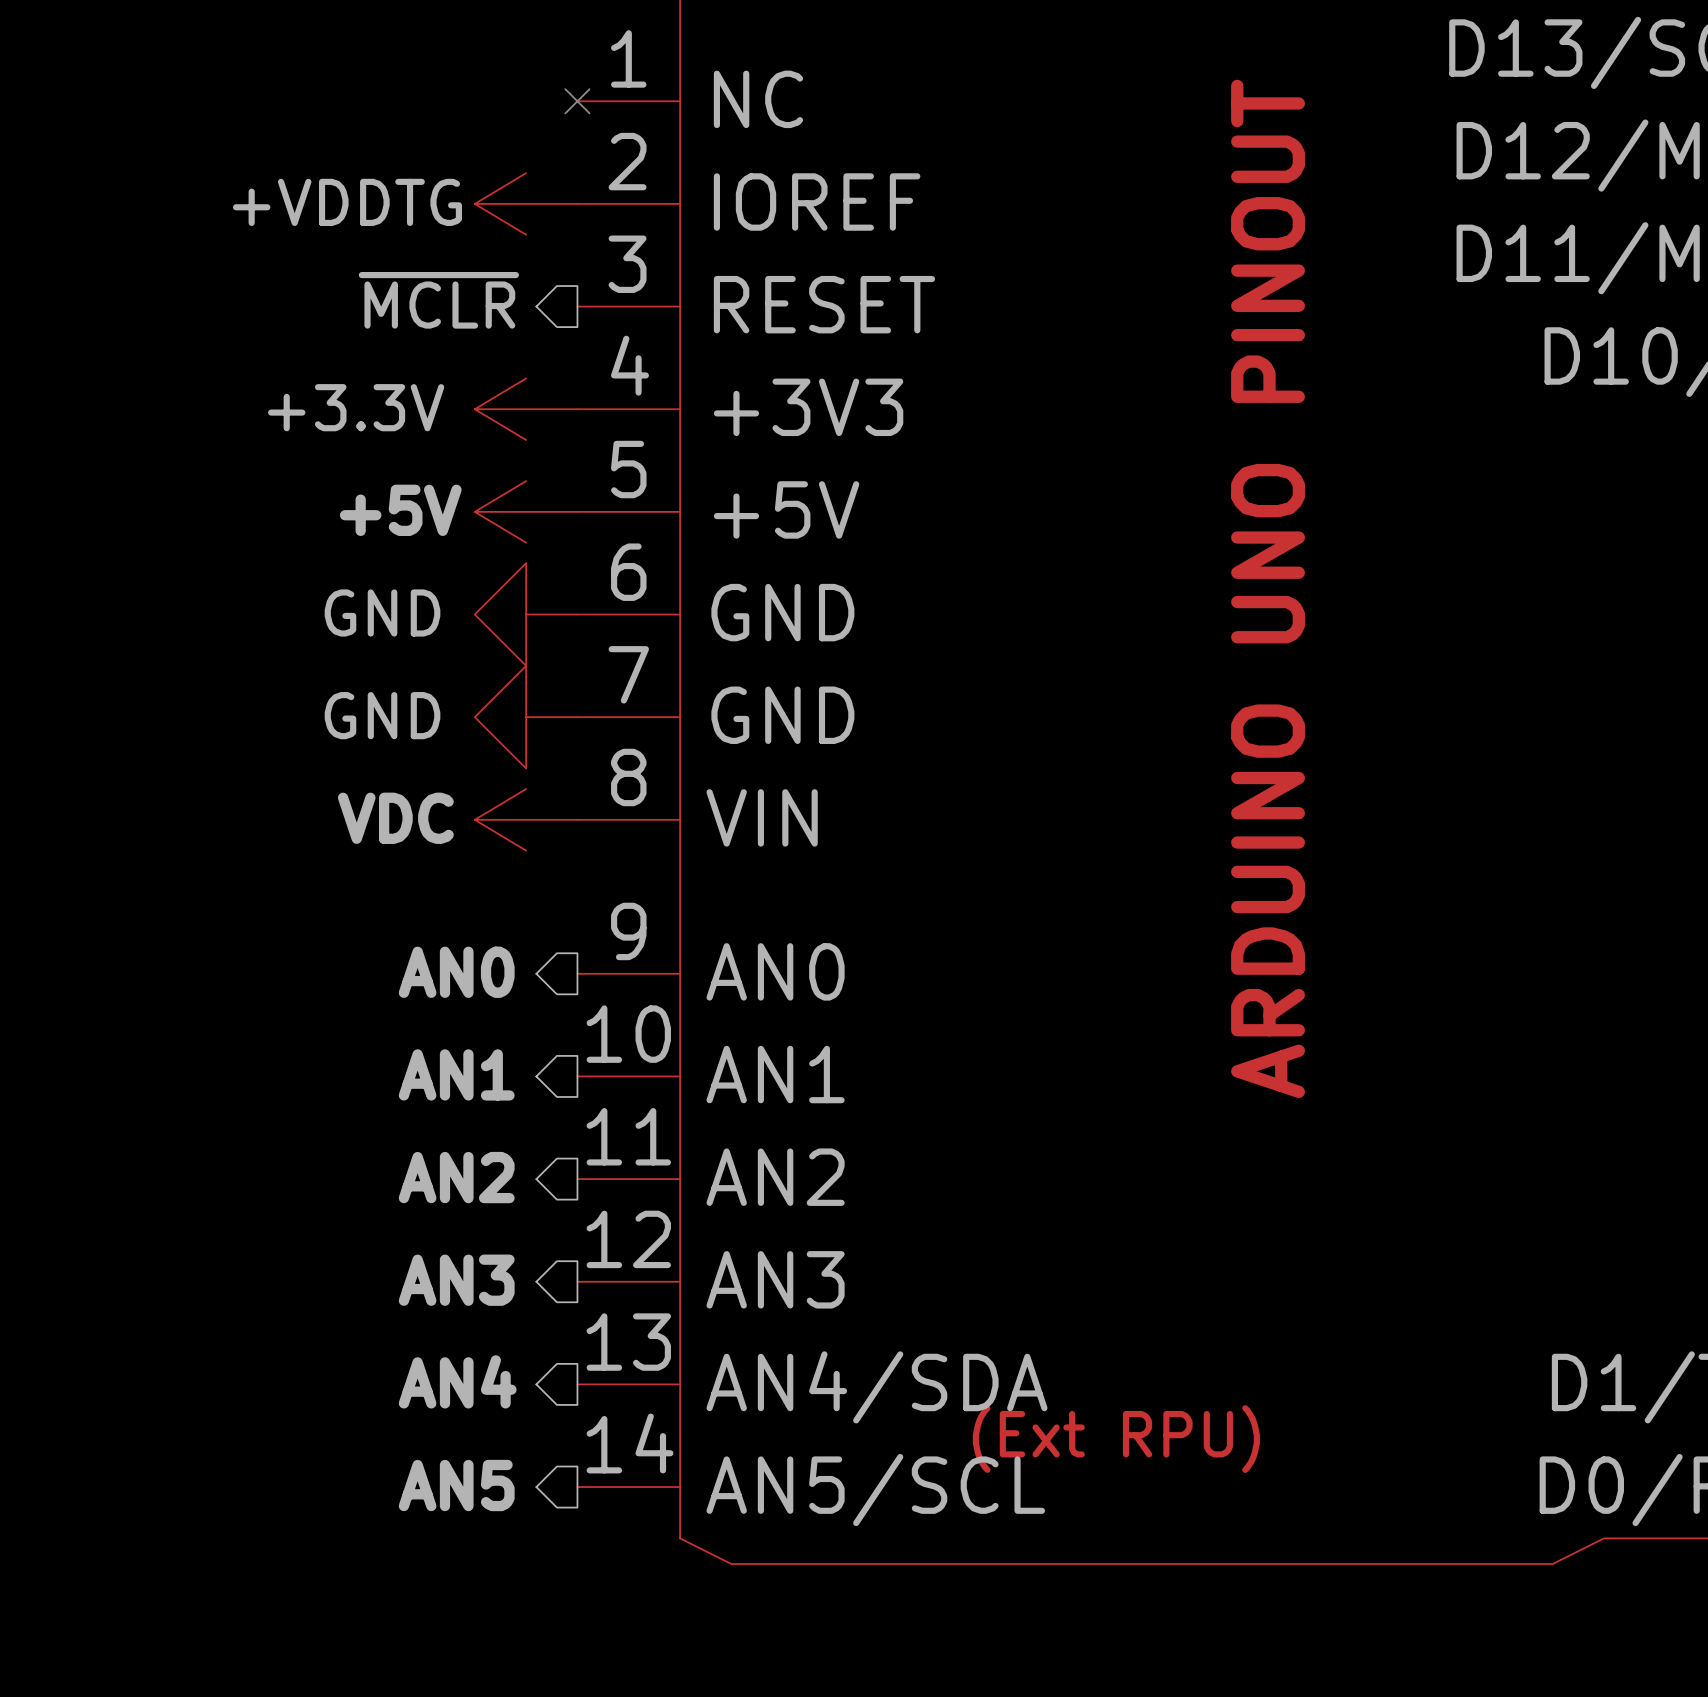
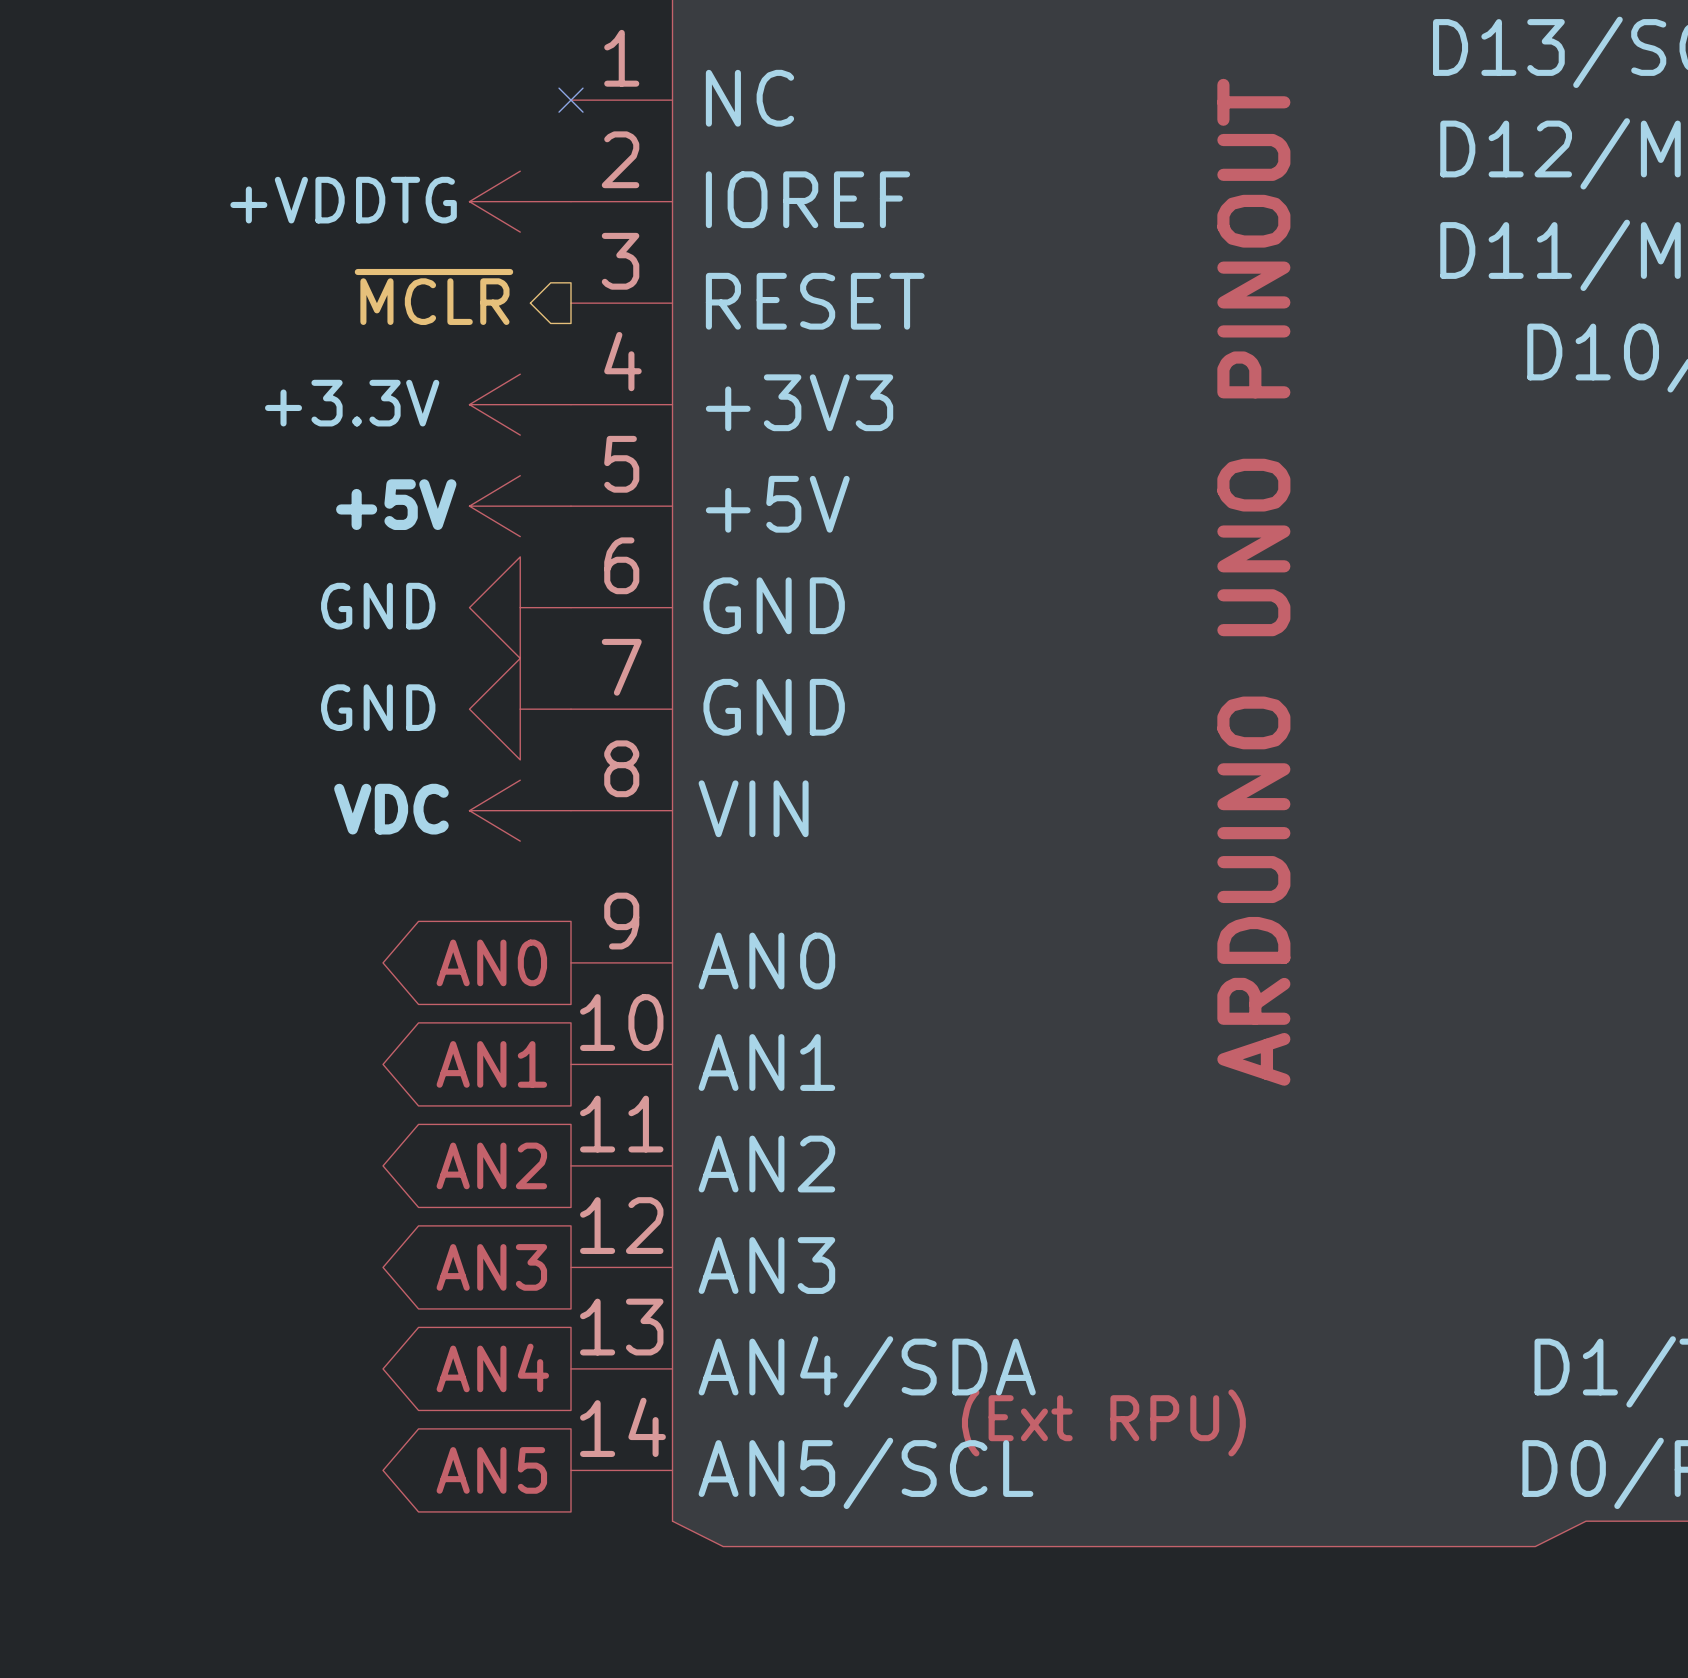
hierarchical label: AN0 (456, 972) -> none
global label: none -> AN0 (491, 962)
hierarchical label: AN1 (456, 1074) -> none
global label: none -> AN1 (491, 1064)
hierarchical label: AN2 (456, 1177) -> none
global label: none -> AN2 (491, 1165)
hierarchical label: AN3 (456, 1280) -> none
global label: none -> AN3 (491, 1267)
hierarchical label: AN4 (457, 1381) -> none
global label: none -> AN4 (492, 1367)
hierarchical label: AN5 (456, 1485) -> none
global label: none -> AN5 (491, 1470)

